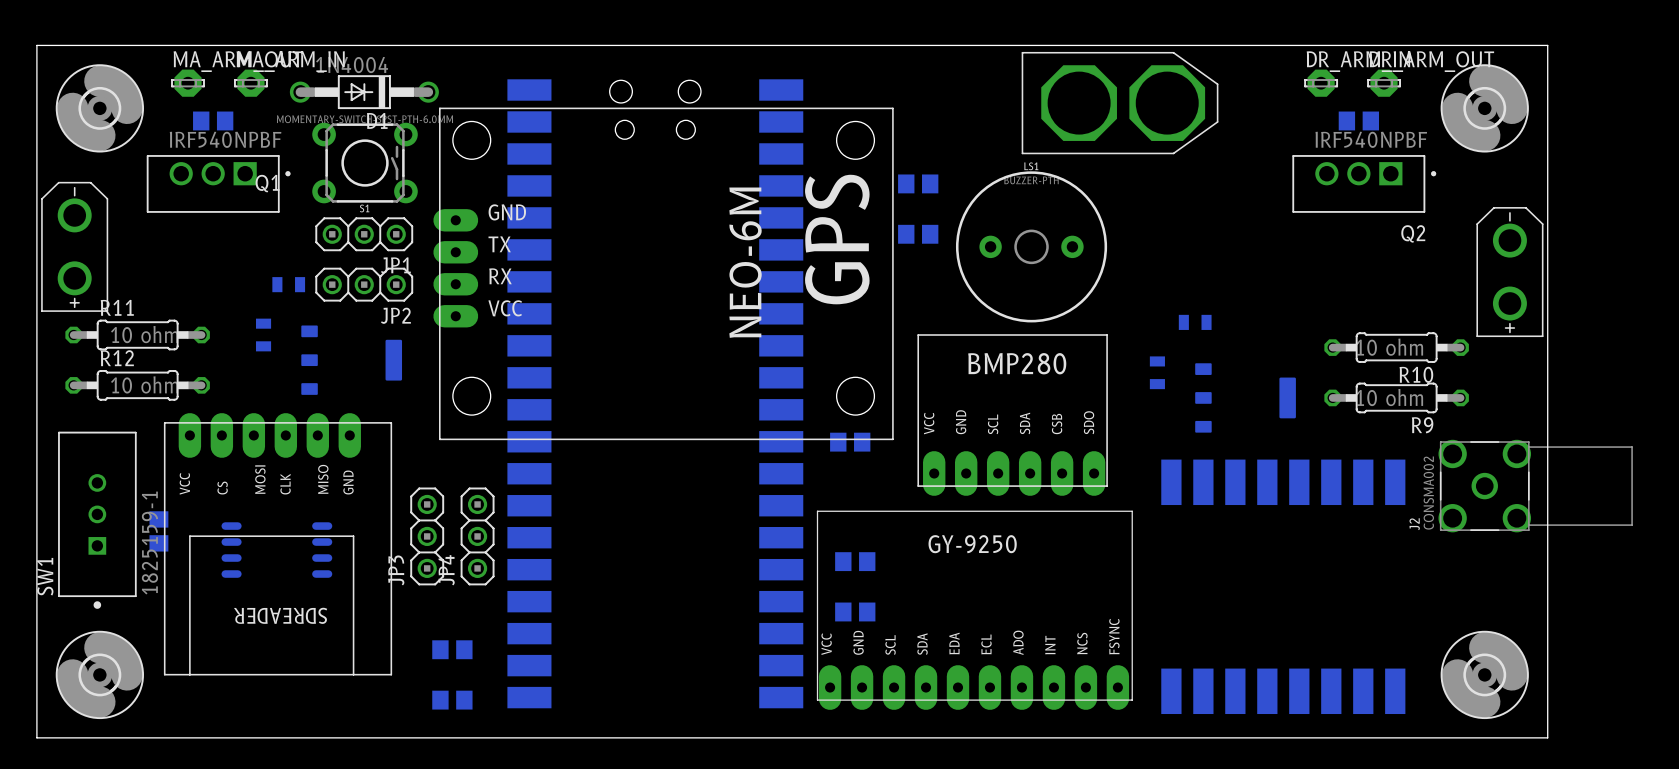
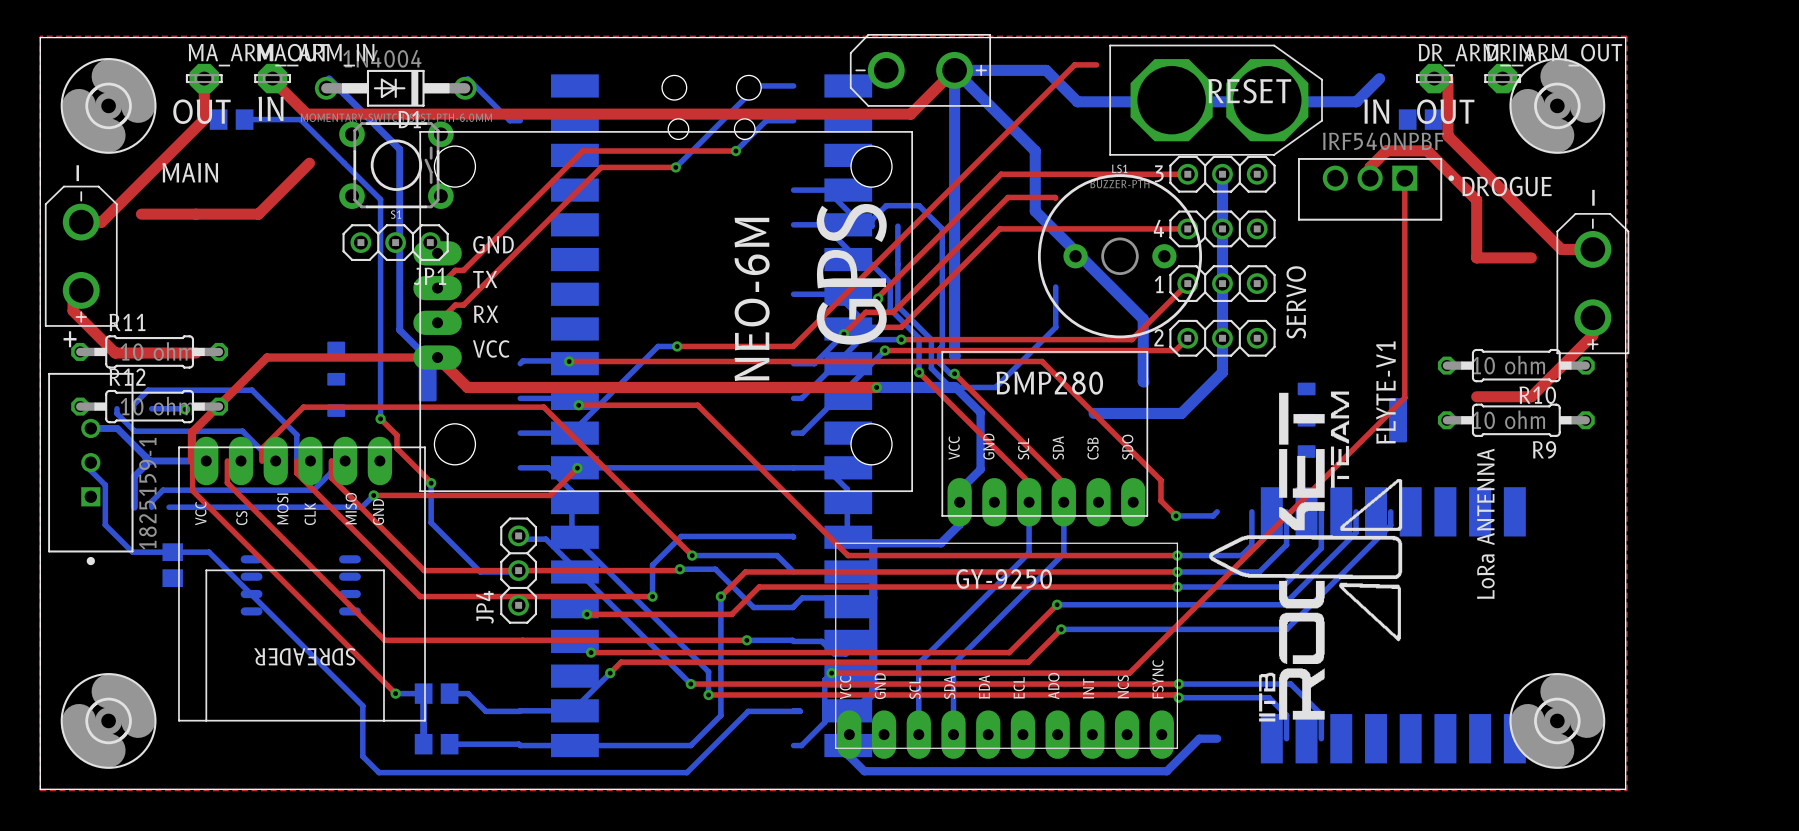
top zone outline: none -> (40, 36) (40, 790) (1627, 790) (1627, 36) (40, 36)
board edge: (1497, 45) (1547, 45) (1547, 737) (1497, 737) -> (1625, 37) (1625, 789)
top track: none -> (1096, 64) (1074, 64) (793, 346) (677, 346)
part: none -> (920, 70)
bottom track: none -> (954, 70) (955, 356)
bottom track: none -> (954, 70) (1035, 151) (1035, 211) (1143, 319) (1143, 382)
bottom track: none -> (954, 70) (1046, 70) (1077, 101) (1356, 101) (1379, 78)
top track: none -> (954, 70) (910, 114) (306, 114) (272, 78)
top track: none -> (204, 78) (204, 119) (101, 222) (73, 222)
bottom track: none -> (329, 78) (399, 149) (399, 330) (427, 357) (437, 357)
bottom track: none -> (467, 78) (509, 120) (520, 120)
top track: none -> (1448, 78) (1448, 135) (1561, 249) (1592, 249)
bottom track: none -> (793, 85) (757, 85) (675, 167)
text: none -> RESET (1249, 91)
part position: (1484, 108) -> (1557, 105)
text: none -> IN (270, 108)
text: none -> OUT (201, 111)
text: none -> IN (1376, 111)
text: none -> OUT (1445, 111)
bottom track: none -> (244, 119) (300, 119) (380, 199) (380, 418)
part position: (1358, 120) -> (1420, 119)
bottom track: none -> (793, 120) (766, 120) (735, 151)
top track: none -> (735, 151) (582, 151) (463, 270) (455, 270) (437, 288)
via: none -> (735, 151)
top track: none -> (309, 163) (258, 214) (141, 214)
top track: none -> (675, 167) (601, 167) (463, 305) (455, 305) (437, 322)
via: none -> (675, 167)
text: none -> MAIN (190, 172)
text: none -> _ (77, 173)
text: none -> 3 (1159, 173)
top track: none -> (1187, 174) (1001, 174) (878, 298)
bottom track: none -> (1222, 174) (1222, 372) (1181, 413) (1094, 413)
part: none -> (1222, 174)
top track: none -> (1370, 178) (1370, 167) (1386, 150) (1427, 150) (1476, 200) (1476, 257) (1531, 257)
top track: none -> (1404, 178) (1404, 397) (1129, 673) (831, 673)
text: none -> DROGUE (1507, 186)
Q1: IRF540NPBF (218, 183) -> none
part: (918, 183) -> none
Q2: IRF540NPBF (1364, 183) -> none
bottom track: none -> (793, 190) (826, 190) (863, 226) (871, 226) (871, 220) (886, 205) (919, 205) (942, 228) (942, 346) (939, 349) (939, 362) (950, 373) (954, 373)
part: none -> IRF540NPBF (1376, 189)
top track: none -> (1055, 198) (1007, 197) (893, 312) (865, 312) (843, 334)
text: none -> _ (1593, 197)
bottom track: none -> (793, 224) (823, 224) (863, 264) (871, 264) (890, 282) (890, 309) (919, 338) (919, 372)
bottom track: none -> (897, 226) (897, 306) (931, 339) (931, 368) (950, 387) (995, 387) (1055, 327) (1055, 287)
text: none -> 4 (1158, 228)
top track: none -> (1187, 228) (999, 228) (901, 327) (878, 327)
part: none -> (1222, 228)
part: (918, 234) -> none
text: none -> 1 (1159, 284)
top track: none -> (1187, 283) (1131, 339) (901, 339)
part: none -> (1222, 283)
part position: (1509, 272) -> (1592, 283)
part position: (663, 273) -> (663, 311)
top track: none -> (73, 290) (73, 310) (115, 353) (196, 353)
bottom track: none -> (793, 294) (836, 294) (869, 327) (878, 327)
part: (288, 284) -> none
JP2: (364, 284) -> none
via: none -> (878, 298)
text: none -> SERVO (1296, 302)
top track: none -> (1592, 317) (1592, 335) (1531, 396) (1476, 396)
bottom track: none -> (843, 334) (814, 363) (793, 363)
via: none -> (843, 334)
text: none -> 2 (1158, 337)
top track: none -> (1187, 338) (1175, 350) (884, 350)
part: none -> (1222, 338)
part: (1195, 322) -> none
text: none -> + (70, 339)
bottom track: none -> (901, 339) (860, 339) (801, 398) (793, 398)
via: none -> (901, 339)
bottom track: none -> (677, 346) (658, 346) (571, 433) (520, 433)
via: none -> (677, 346)
bottom track: none -> (884, 350) (802, 433) (793, 433)
via: none -> (884, 350)
part: (263, 335) -> none
bottom track: none -> (569, 361) (522, 360) (520, 363)
top track: none -> (569, 361) (1042, 361) (1160, 480) (1160, 500) (1176, 515)
via: none -> (569, 361)
top track: none -> (919, 372) (1029, 482) (1029, 502)
via: none -> (919, 372)
top track: none -> (954, 373) (1063, 483) (1063, 502)
via: none -> (954, 373)
bottom track: none -> (876, 387) (955, 387) (980, 412) (980, 469) (959, 490) (959, 524) (940, 543) (873, 543) (873, 692) (849, 716) (849, 756) (864, 771) (1166, 771) (1199, 738) (1217, 738)
top track: none -> (876, 387) (467, 387) (437, 357) (267, 357) (191, 432) (192, 490) (395, 693)
via: none -> (876, 387)
drawing: none -> [1209, 391, 1403, 722]
part: (1157, 372) -> none
text: none -> FLYTE-V1 (1386, 392)
bottom track: none -> (520, 398) (571, 398) (578, 405)
top track: none -> (578, 405) (697, 405) (848, 555) (1177, 555)
via: none -> (578, 405)
bottom track: none -> (117, 408) (117, 413) (134, 431) (242, 431) (262, 450) (262, 461)
bottom track: none -> (134, 408) (134, 404) (148, 390) (252, 390) (296, 434) (296, 461)
bottom track: none -> (151, 408) (185, 409)
via: none -> (185, 409)
top track: none -> (380, 418) (396, 435) (396, 448) (431, 483)
via: none -> (380, 418)
bottom track: none -> (90, 428) (117, 428) (149, 461)
part position: (1012, 415) -> (1044, 438)
bottom track: none -> (149, 461) (192, 461)
bottom track: none -> (149, 461) (134, 476) (134, 507)
top track: none -> (227, 461) (227, 483) (384, 640) (746, 640)
top track: none -> (262, 461) (262, 448) (303, 407) (543, 407) (692, 555)
top track: none -> (296, 461) (296, 473) (420, 596) (652, 596)
bottom track: none -> (331, 461) (331, 472) (313, 490) (163, 490) (151, 501) (151, 507)
top track: none -> (331, 461) (331, 477) (424, 570) (679, 569)
bottom track: none -> (90, 462) (90, 470) (105, 485) (105, 524) (132, 552) (209, 552) (362, 705) (362, 756) (378, 772) (686, 772) (748, 711) (800, 711) (793, 710)
bottom track: none -> (520, 467) (548, 467) (571, 491) (571, 535) (708, 671) (708, 694)
part: none -> 1825159-1 (90, 469)
bottom track: none -> (577, 468) (825, 467) (847, 489) (847, 543)
top track: none -> (577, 468) (550, 495) (373, 495)
via: none -> (577, 468)
part: (850, 442) -> none
bottom track: none -> (431, 483) (431, 522) (480, 571) (520, 571)
via: none -> (431, 483)
bottom track: none -> (373, 495) (361, 507) (169, 507)
via: none -> (373, 495)
bottom track: none -> (1029, 502) (1029, 552) (918, 663) (918, 734)
bottom track: none -> (1063, 502) (1063, 553) (953, 663) (953, 734)
bottom track: none -> (1217, 511) (1213, 515) (1176, 515)
bottom track: none -> (1251, 511) (1251, 545) (1241, 555) (1177, 555)
bottom track: none -> (1286, 511) (1286, 544) (1259, 571) (1177, 571)
bottom track: none -> (1321, 511) (1321, 548) (1282, 587) (1177, 587)
bottom track: none -> (1356, 511) (1356, 532) (1283, 604) (1057, 604)
bottom track: none -> (1390, 511) (1390, 525) (1286, 629) (1061, 629)
via: none -> (1176, 515)
J2: CONSMA002 (1535, 486) -> none
text: none -> LoRa ANTENNA (1485, 523)
bottom track: none -> (520, 537) (522, 539) (545, 539) (690, 684)
bottom track: none -> (793, 537) (681, 536) (652, 565) (652, 596)
SW1: 1825159-1 (97, 520) -> none
bottom track: none -> (692, 555) (777, 555) (793, 571)
via: none -> (692, 555)
via: none -> (1177, 555)
bottom track: none -> (679, 569) (715, 569) (753, 607) (792, 607) (802, 597) (847, 597)
via: none -> (679, 569)
JP3: (427, 536) -> none
top track: none -> (1177, 571) (745, 571) (720, 596)
via: none -> (1177, 571)
top track: none -> (1177, 587) (759, 587) (731, 614) (586, 614)
via: none -> (1177, 587)
via: none -> (652, 596)
bottom track: none -> (720, 596) (720, 715) (690, 745) (449, 744)
via: none -> (720, 596)
part: (855, 561) -> none
top track: none -> (1057, 604) (1009, 652) (591, 652)
via: none -> (1057, 604)
via: none -> (586, 614)
top track: none -> (1061, 629) (1028, 662) (621, 662) (610, 673)
via: none -> (1061, 629)
bottom track: none -> (746, 640) (821, 641) (834, 653) (847, 652)
via: none -> (746, 640)
part position: (974, 610) -> (1006, 650)
via: none -> (591, 652)
part: (855, 611) -> none
bottom track: none -> (610, 673) (572, 710) (485, 711) (468, 693) (449, 693)
via: none -> (610, 673)
bottom track: none -> (831, 673) (824, 679) (824, 722) (801, 745) (793, 745)
via: none -> (831, 673)
top track: none -> (690, 684) (1178, 684)
via: none -> (690, 684)
bottom track: none -> (1178, 684) (1290, 684) (1321, 714) (1321, 738)
via: none -> (1178, 684)
bottom track: none -> (395, 693) (423, 693) (423, 744)
via: none -> (395, 693)
part: none -> (436, 693)
part: (452, 649) -> none
top track: none -> (708, 694) (1176, 694) (1178, 697)
via: none -> (708, 694)
bottom track: none -> (1178, 697) (1268, 697) (1286, 715) (1286, 738)
via: none -> (1178, 697)
part position: (1484, 674) -> (1557, 720)
part: none -> (436, 744)
part: (452, 700) -> none

